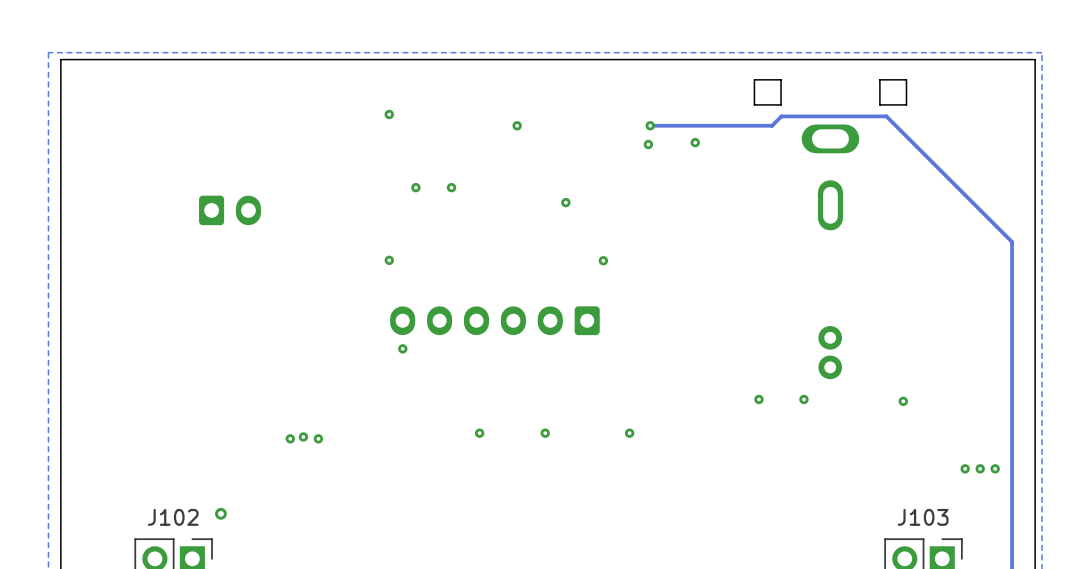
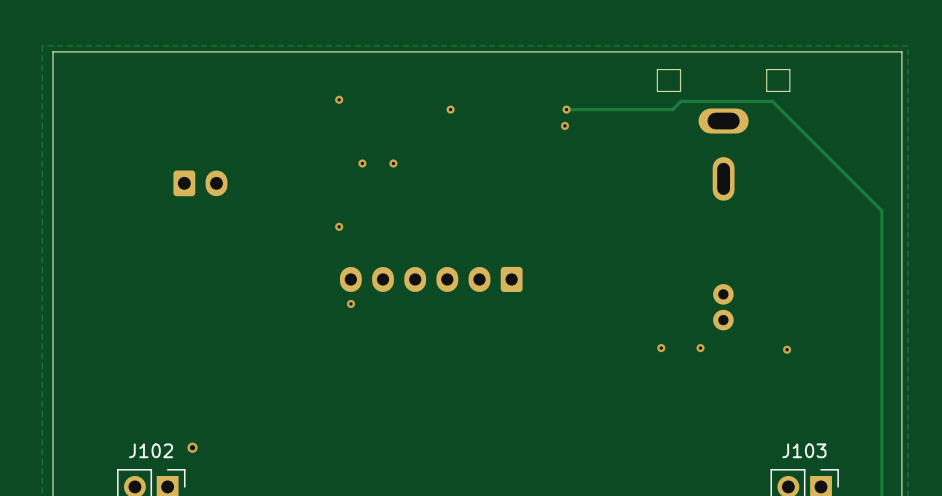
via: (695, 142) -> none
via: (565, 202) -> none
via: (603, 260) -> none
via: (479, 433) -> none
via: (545, 433) -> none
via: (629, 433) -> none
via: (303, 436) -> none
via: (290, 438) -> none
via: (318, 438) -> none
via: (965, 468) -> none
via: (980, 468) -> none
via: (995, 468) -> none

